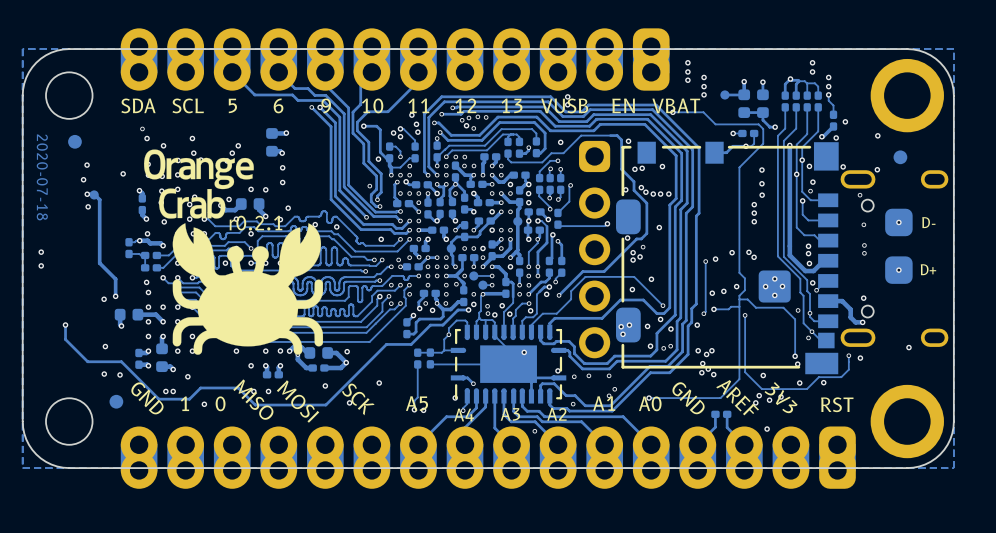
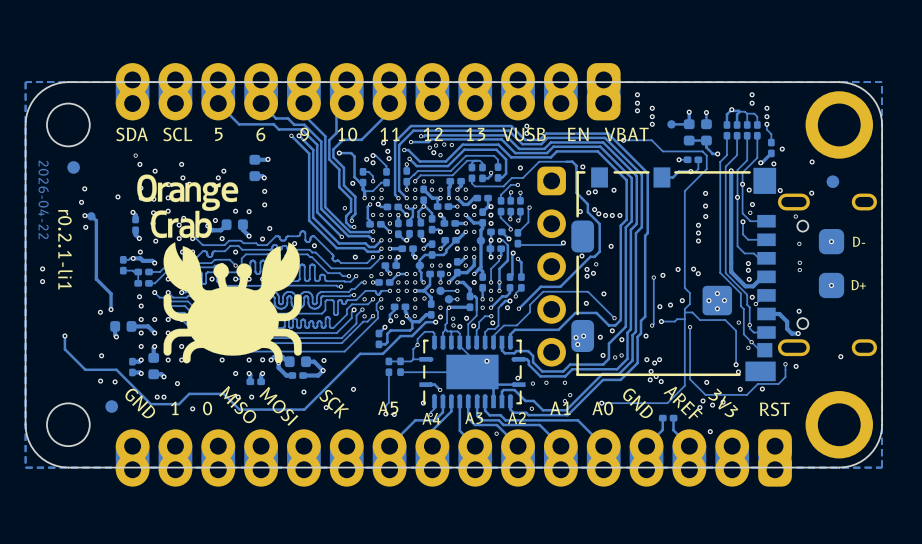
text: 2020-07-18 (42, 177) -> 2026-04-22 (43, 199)
text: r0.2.1 (256, 223) -> none
text: none -> r0.2.1-li1 (65, 249)

